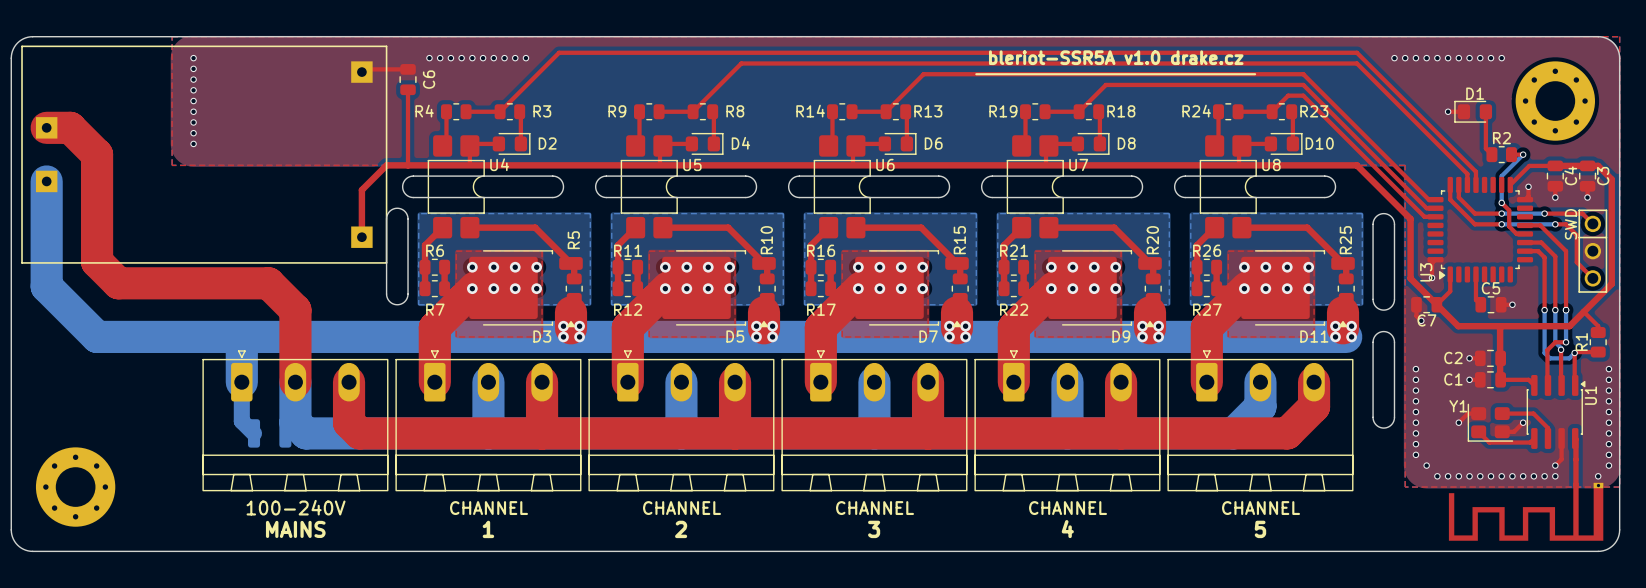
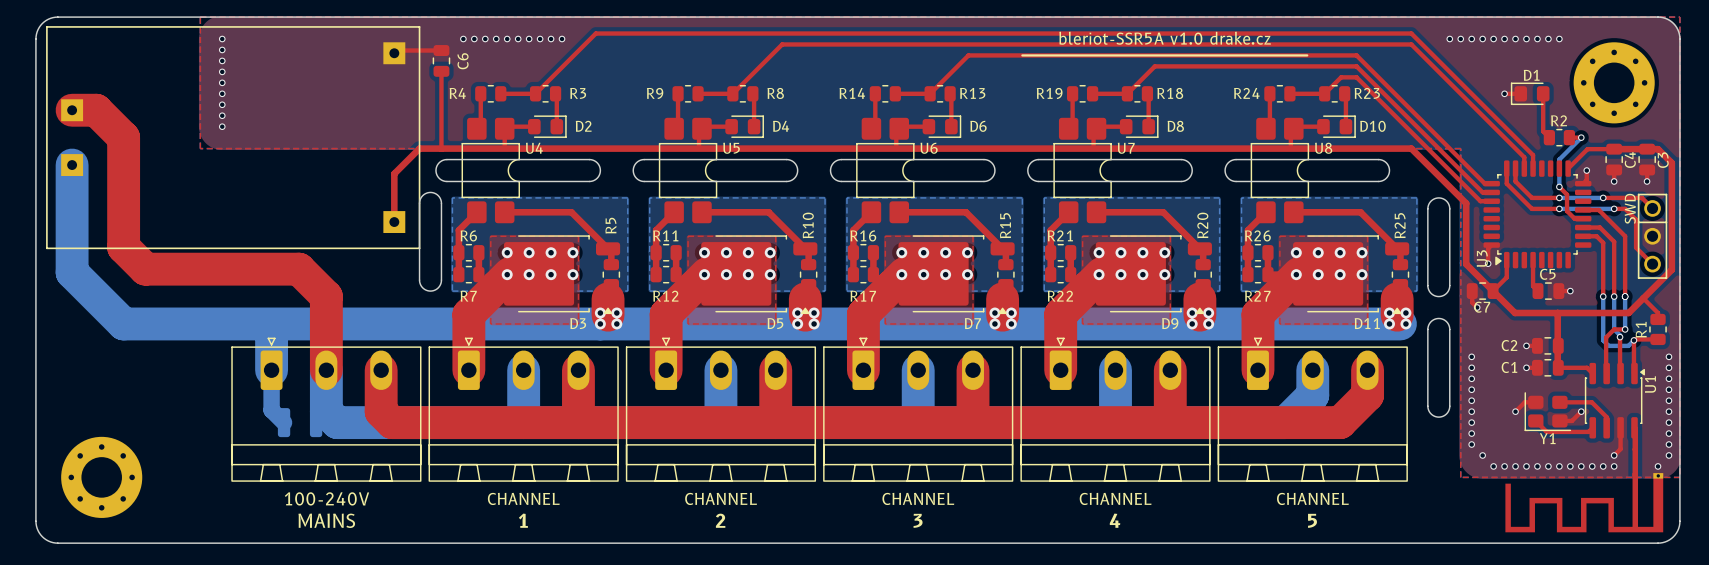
Y1 name position: Y1 (1458, 406) -> Y1 (1547, 438)

